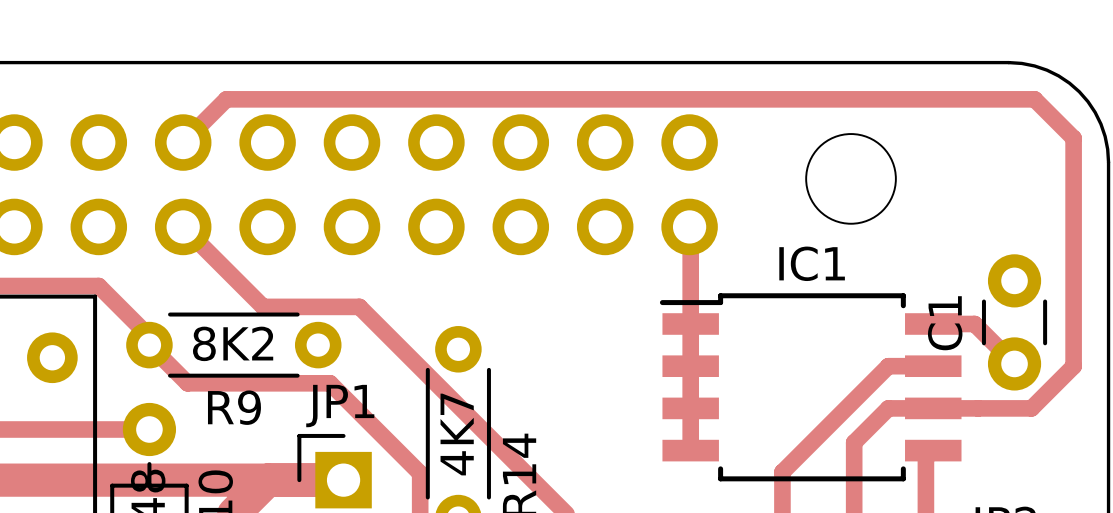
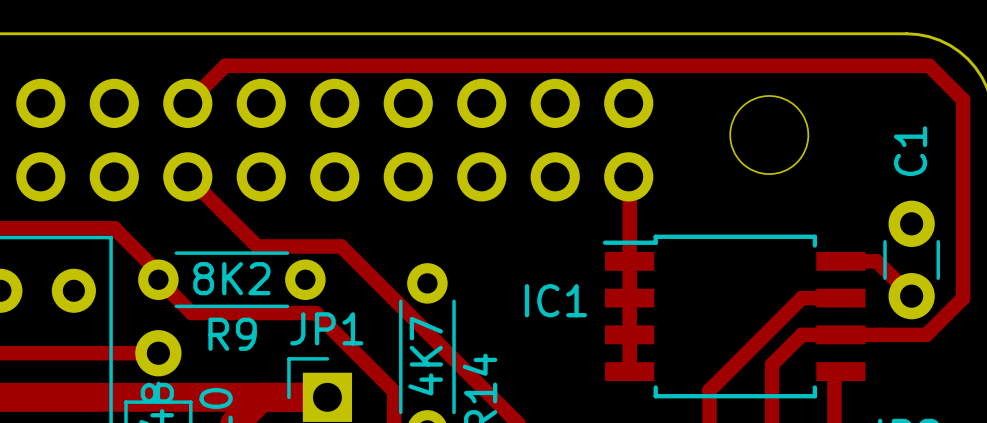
IC1 name position: IC1 (812, 263) -> IC1 (555, 300)
C1 name position: C1 (945, 323) -> C1 (910, 151)

